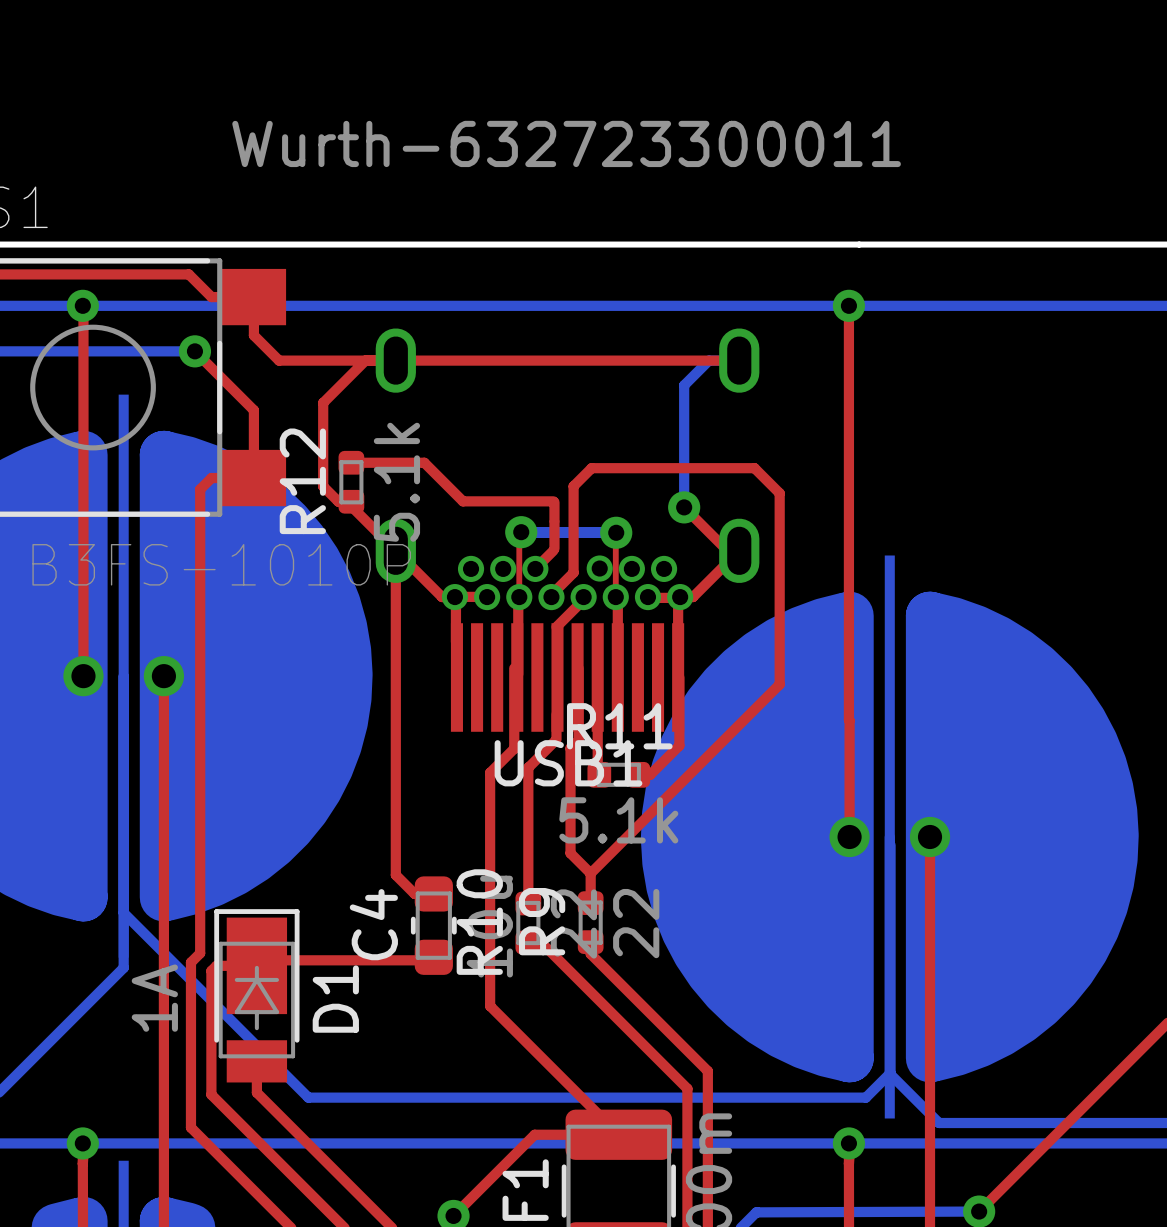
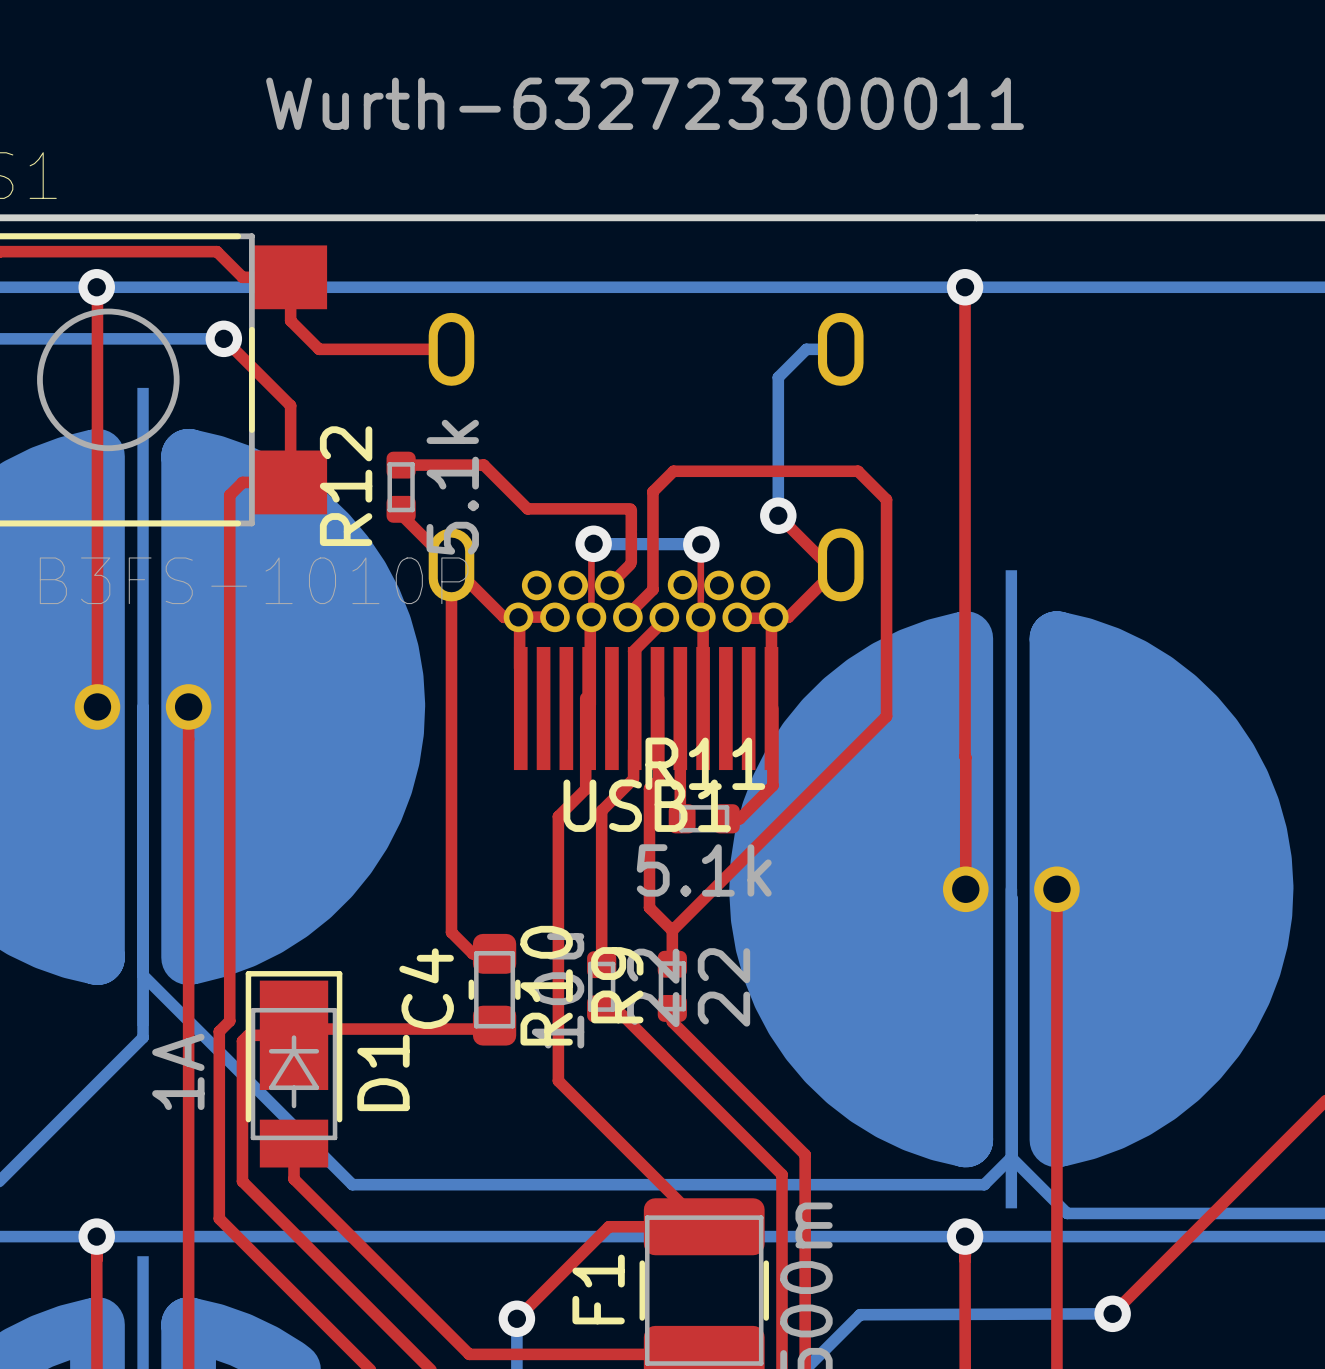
top track: (365, 360) (323, 402) (323, 486) (338, 501) (351, 501) -> none
top track: (395, 360) (739, 360) -> none

